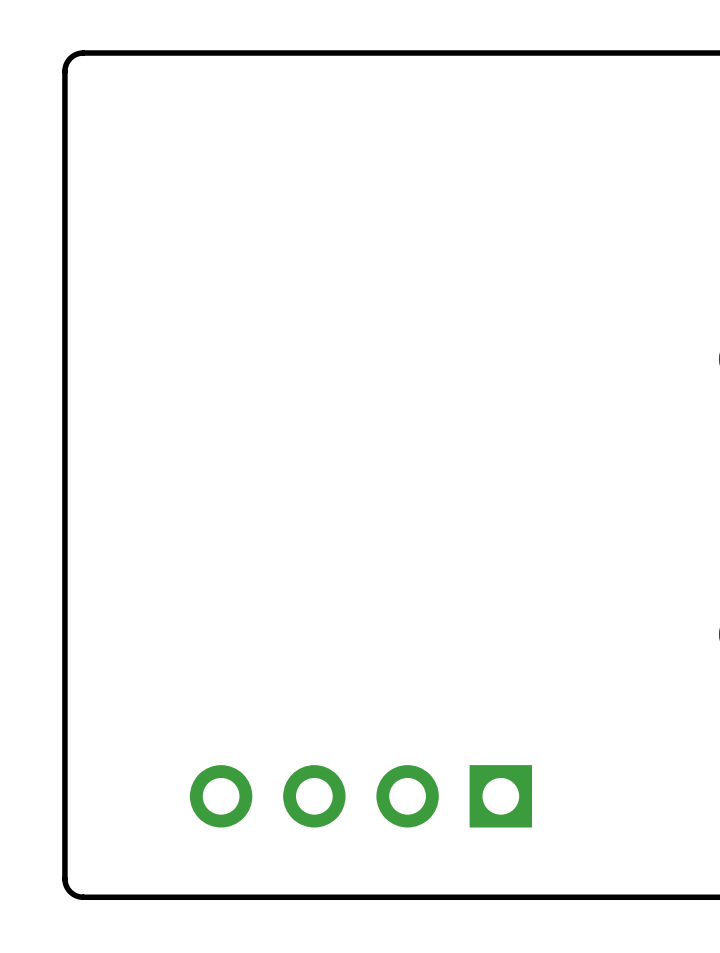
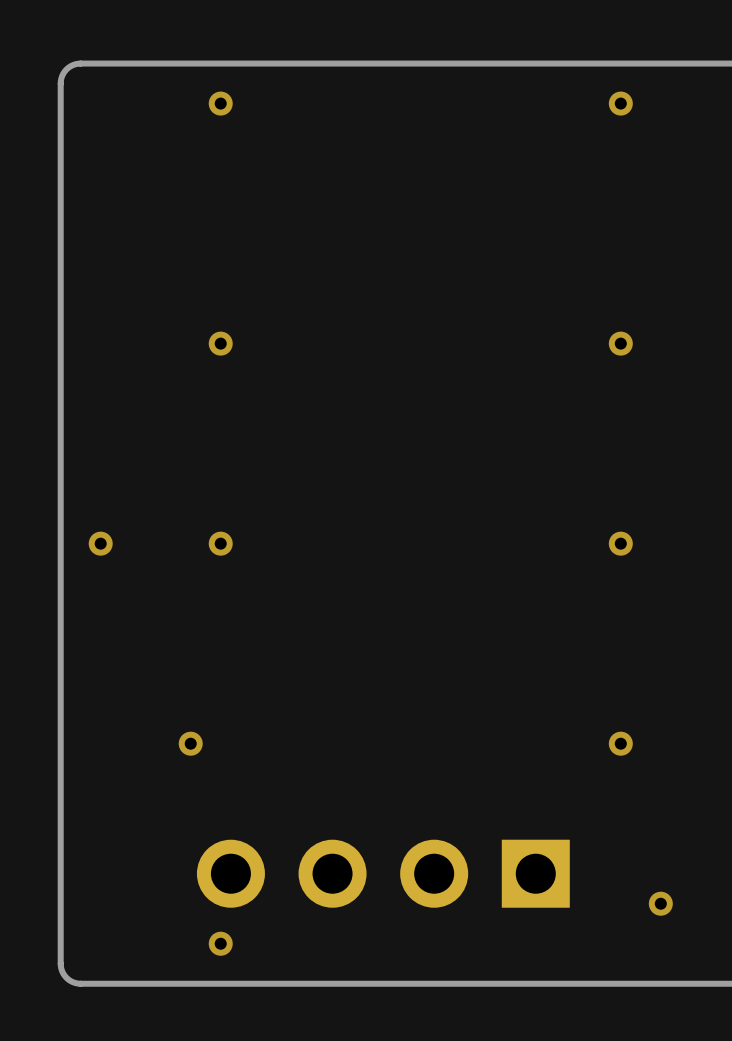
via: none -> (220, 103)
via: none -> (620, 103)
via: none -> (220, 343)
via: none -> (620, 343)
via: none -> (100, 543)
via: none -> (220, 543)
via: none -> (620, 543)
via: none -> (190, 743)
via: none -> (620, 743)
via: none -> (660, 903)
via: none -> (220, 943)

